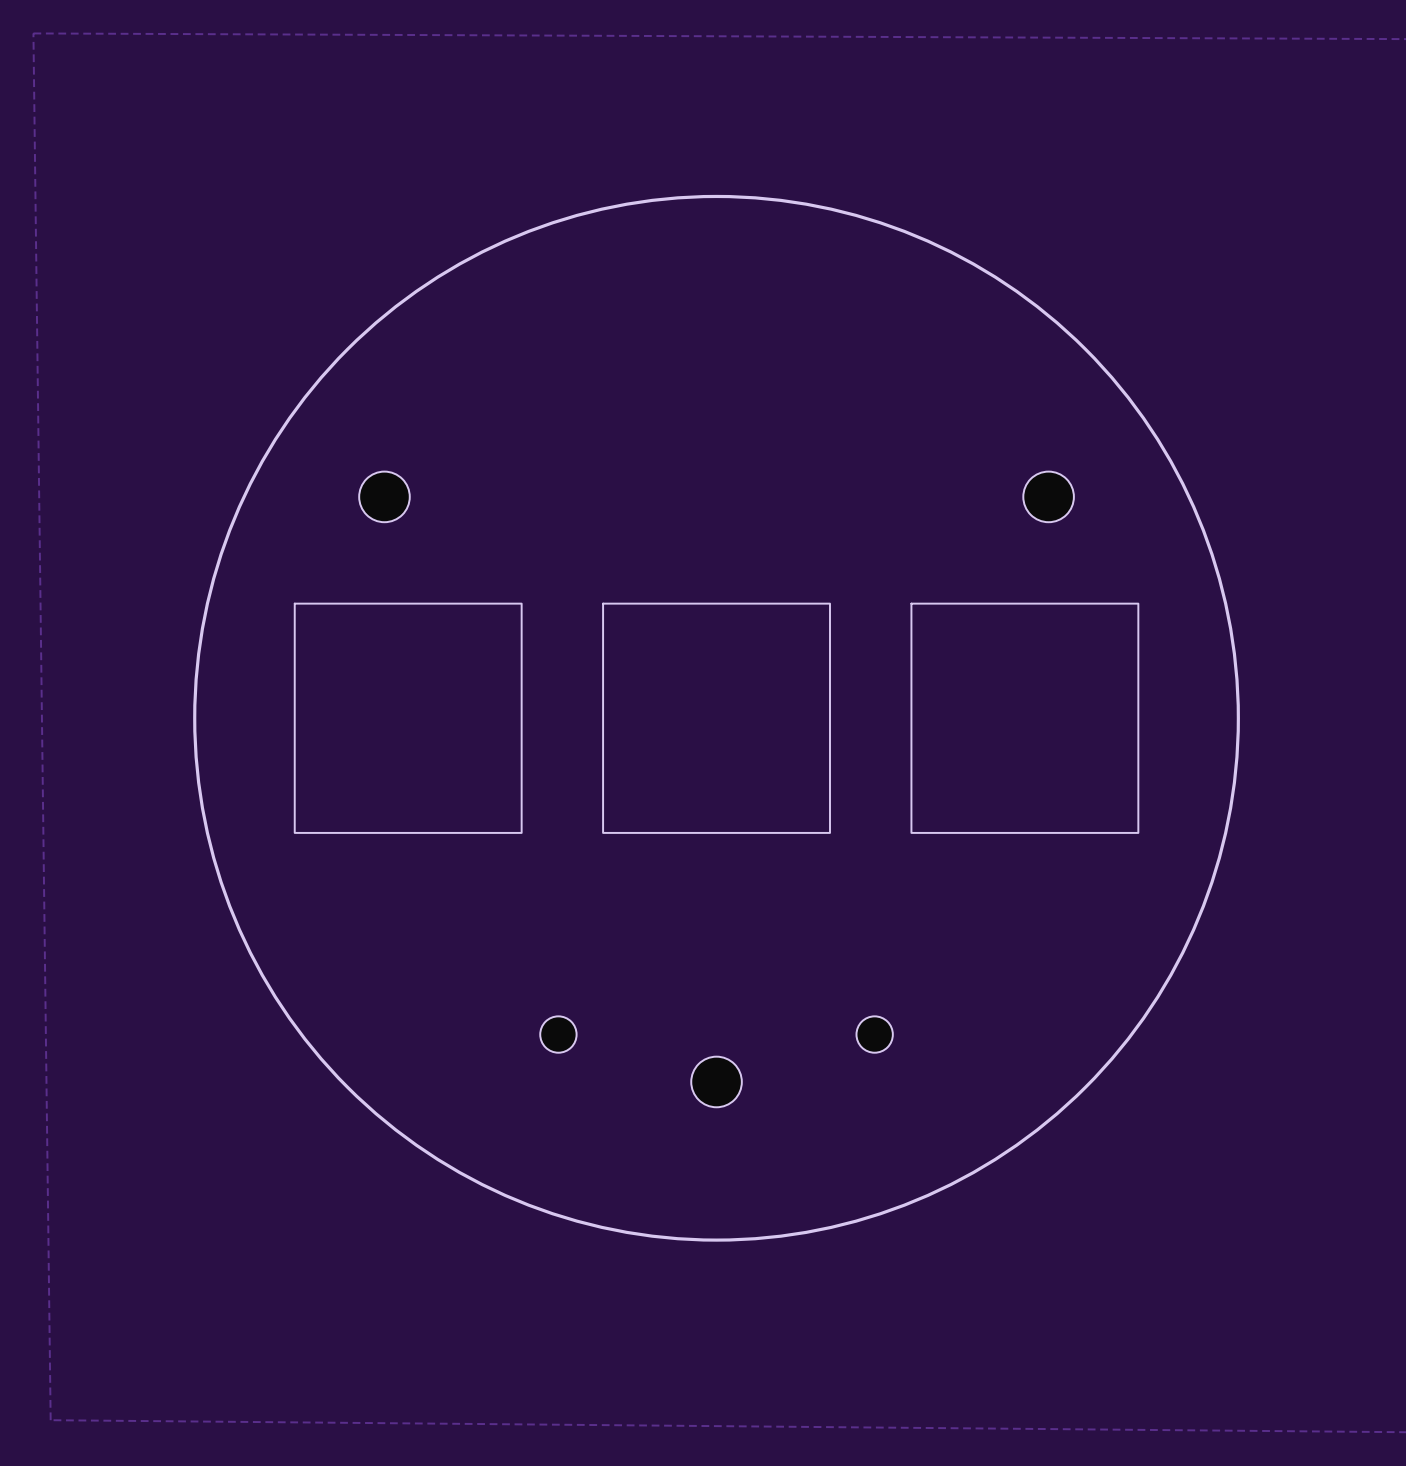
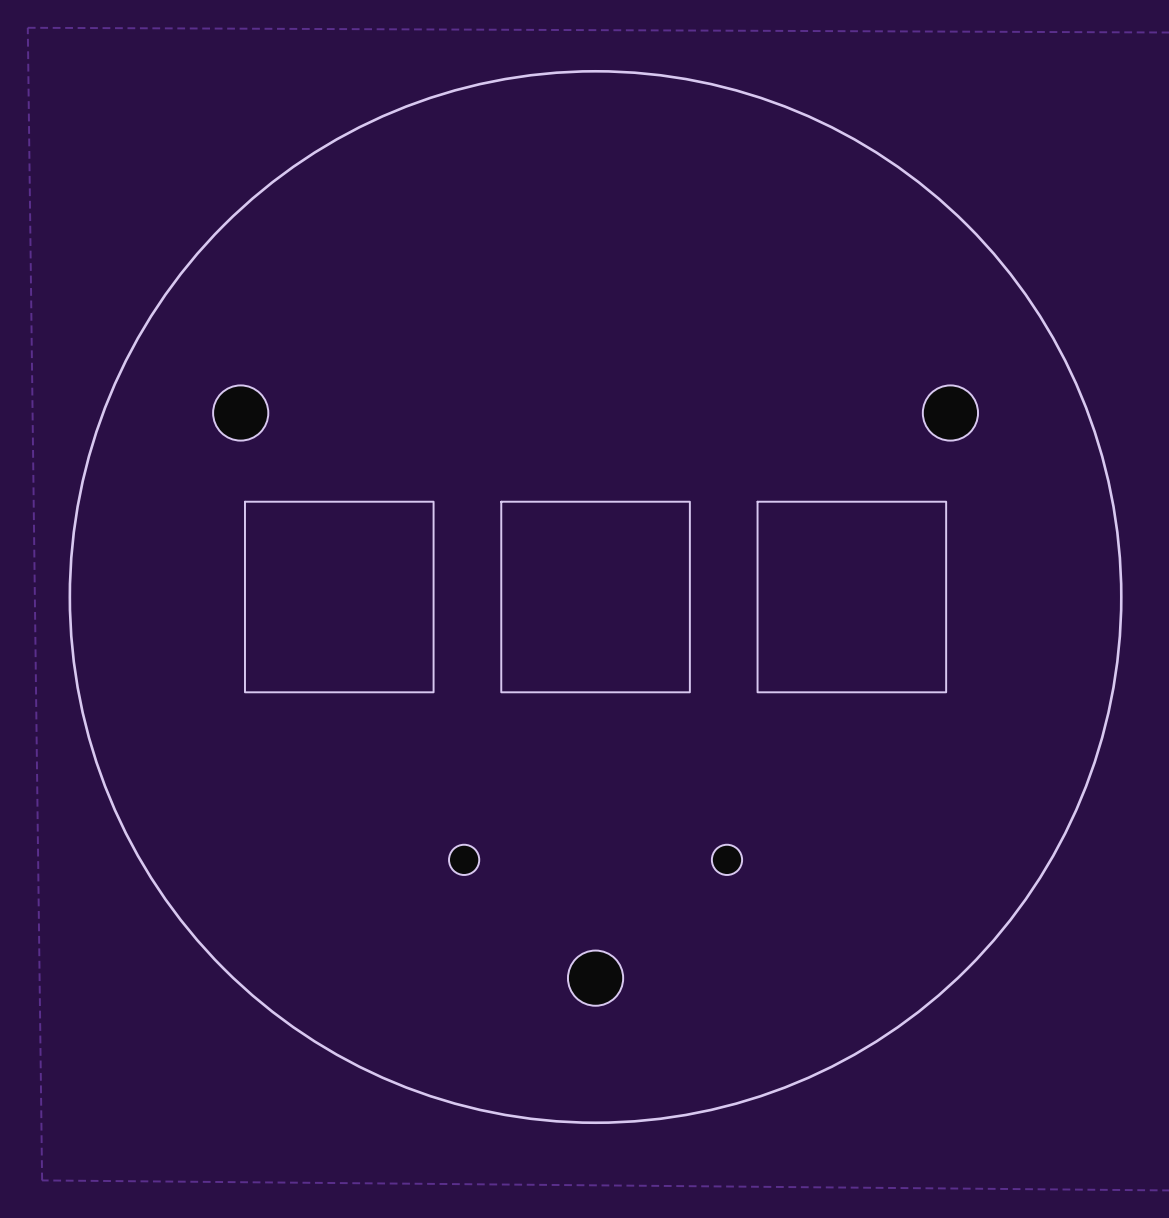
round board edge size: [193, 194, 1240, 1242] -> [68, 69, 1123, 1125]
part: none -> (240, 413)
part: (384, 496) -> none
part: (1048, 496) -> none
part: none -> (950, 413)
part: (716, 1081) -> none
part: none -> (595, 978)

